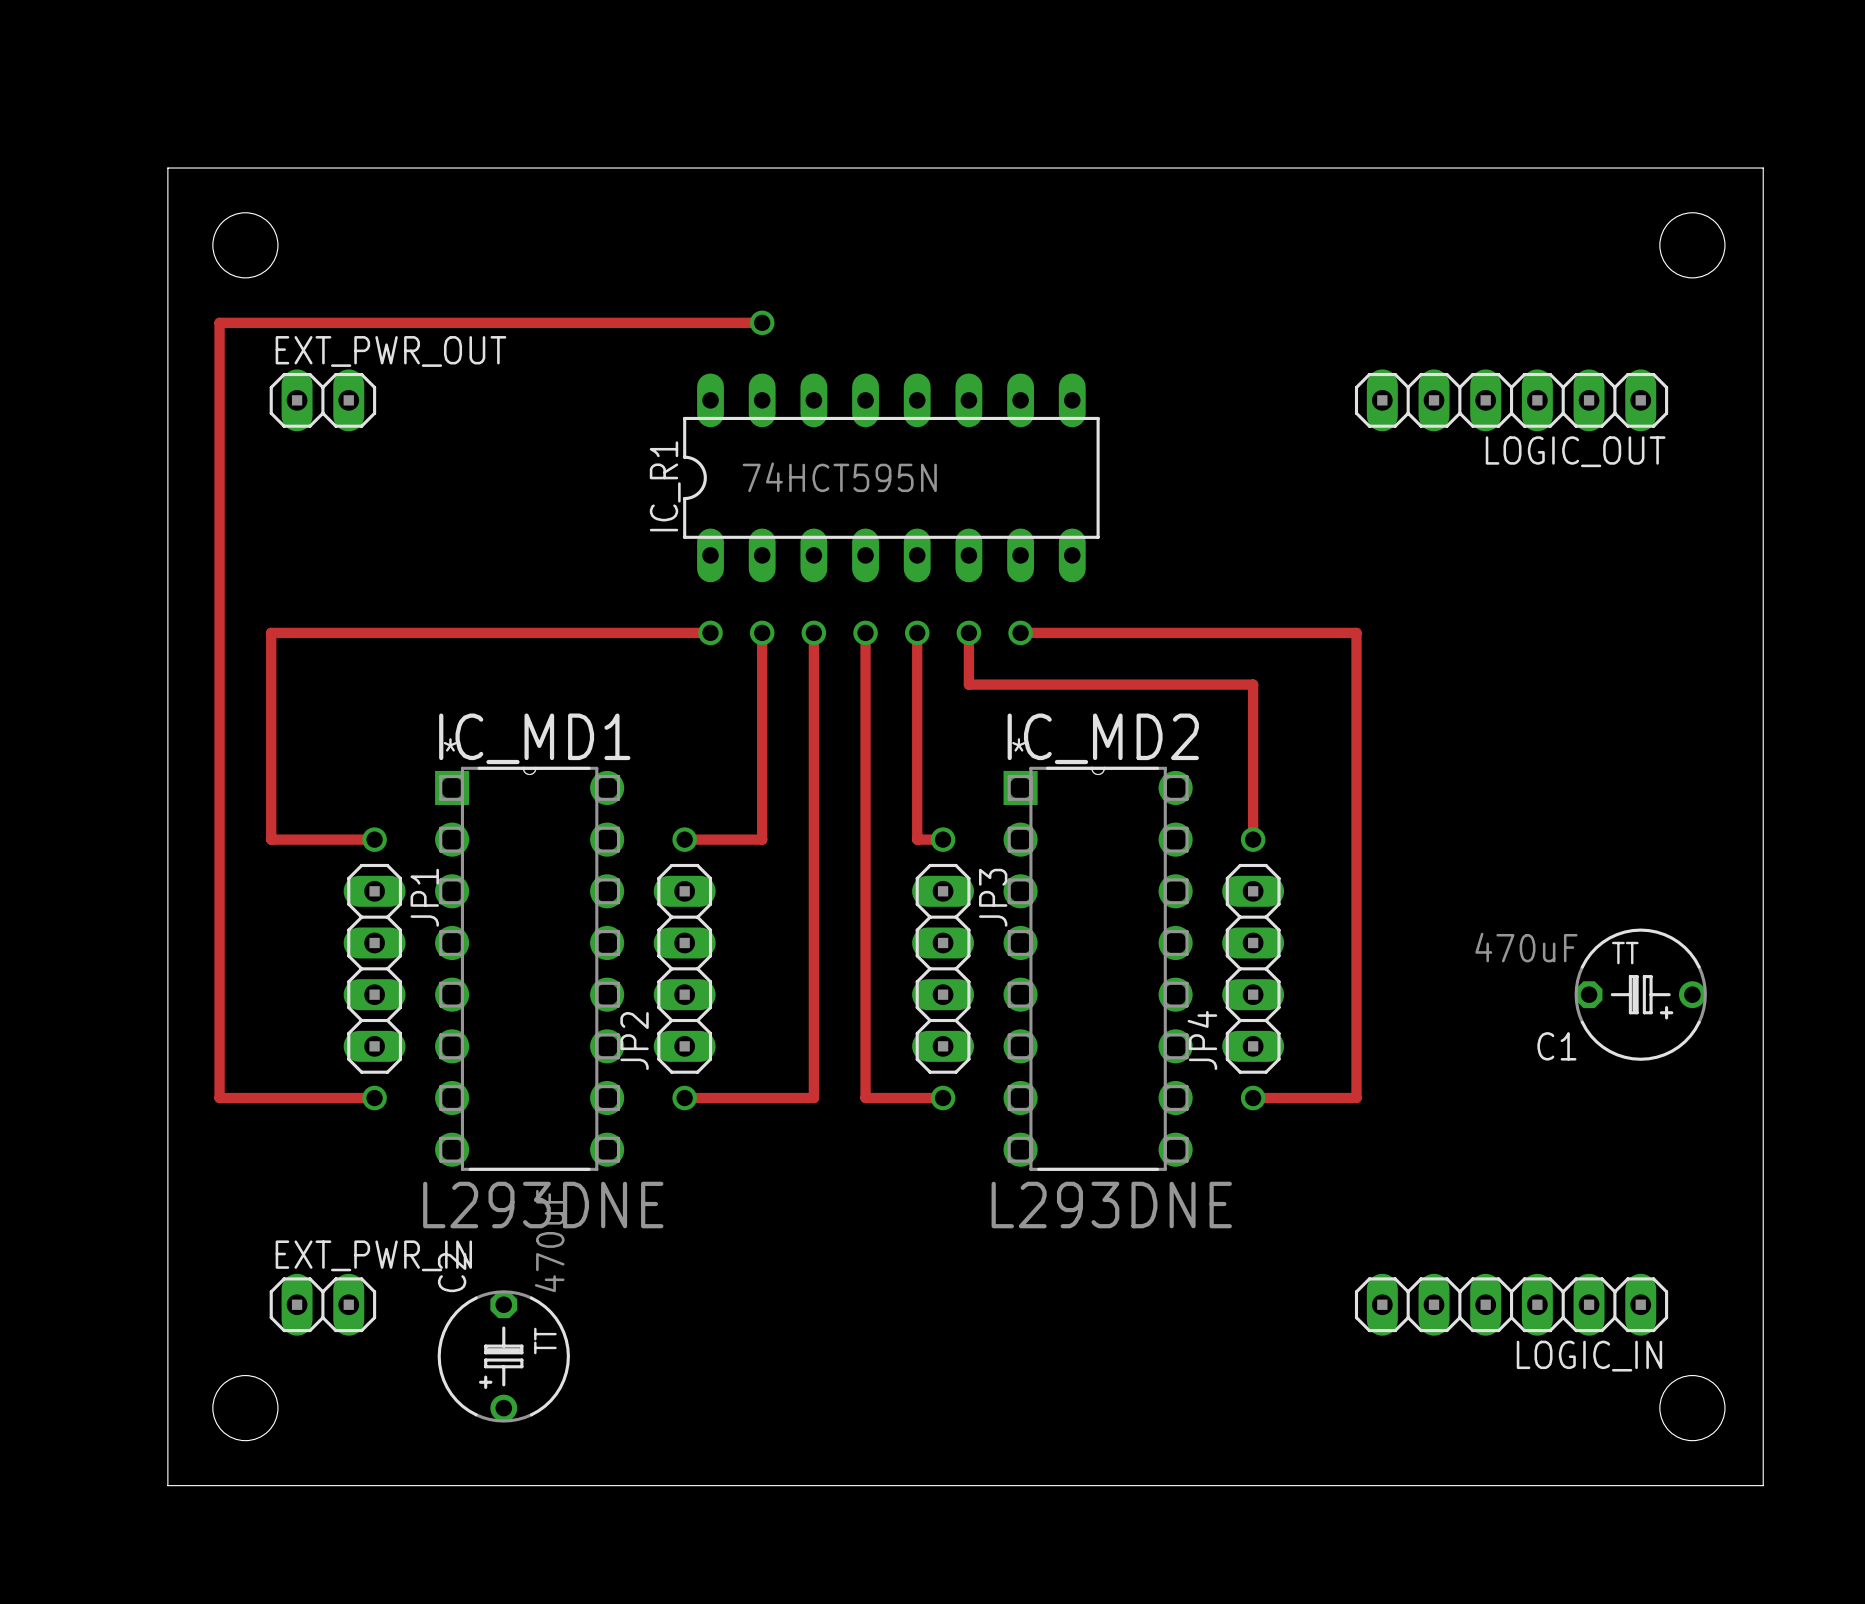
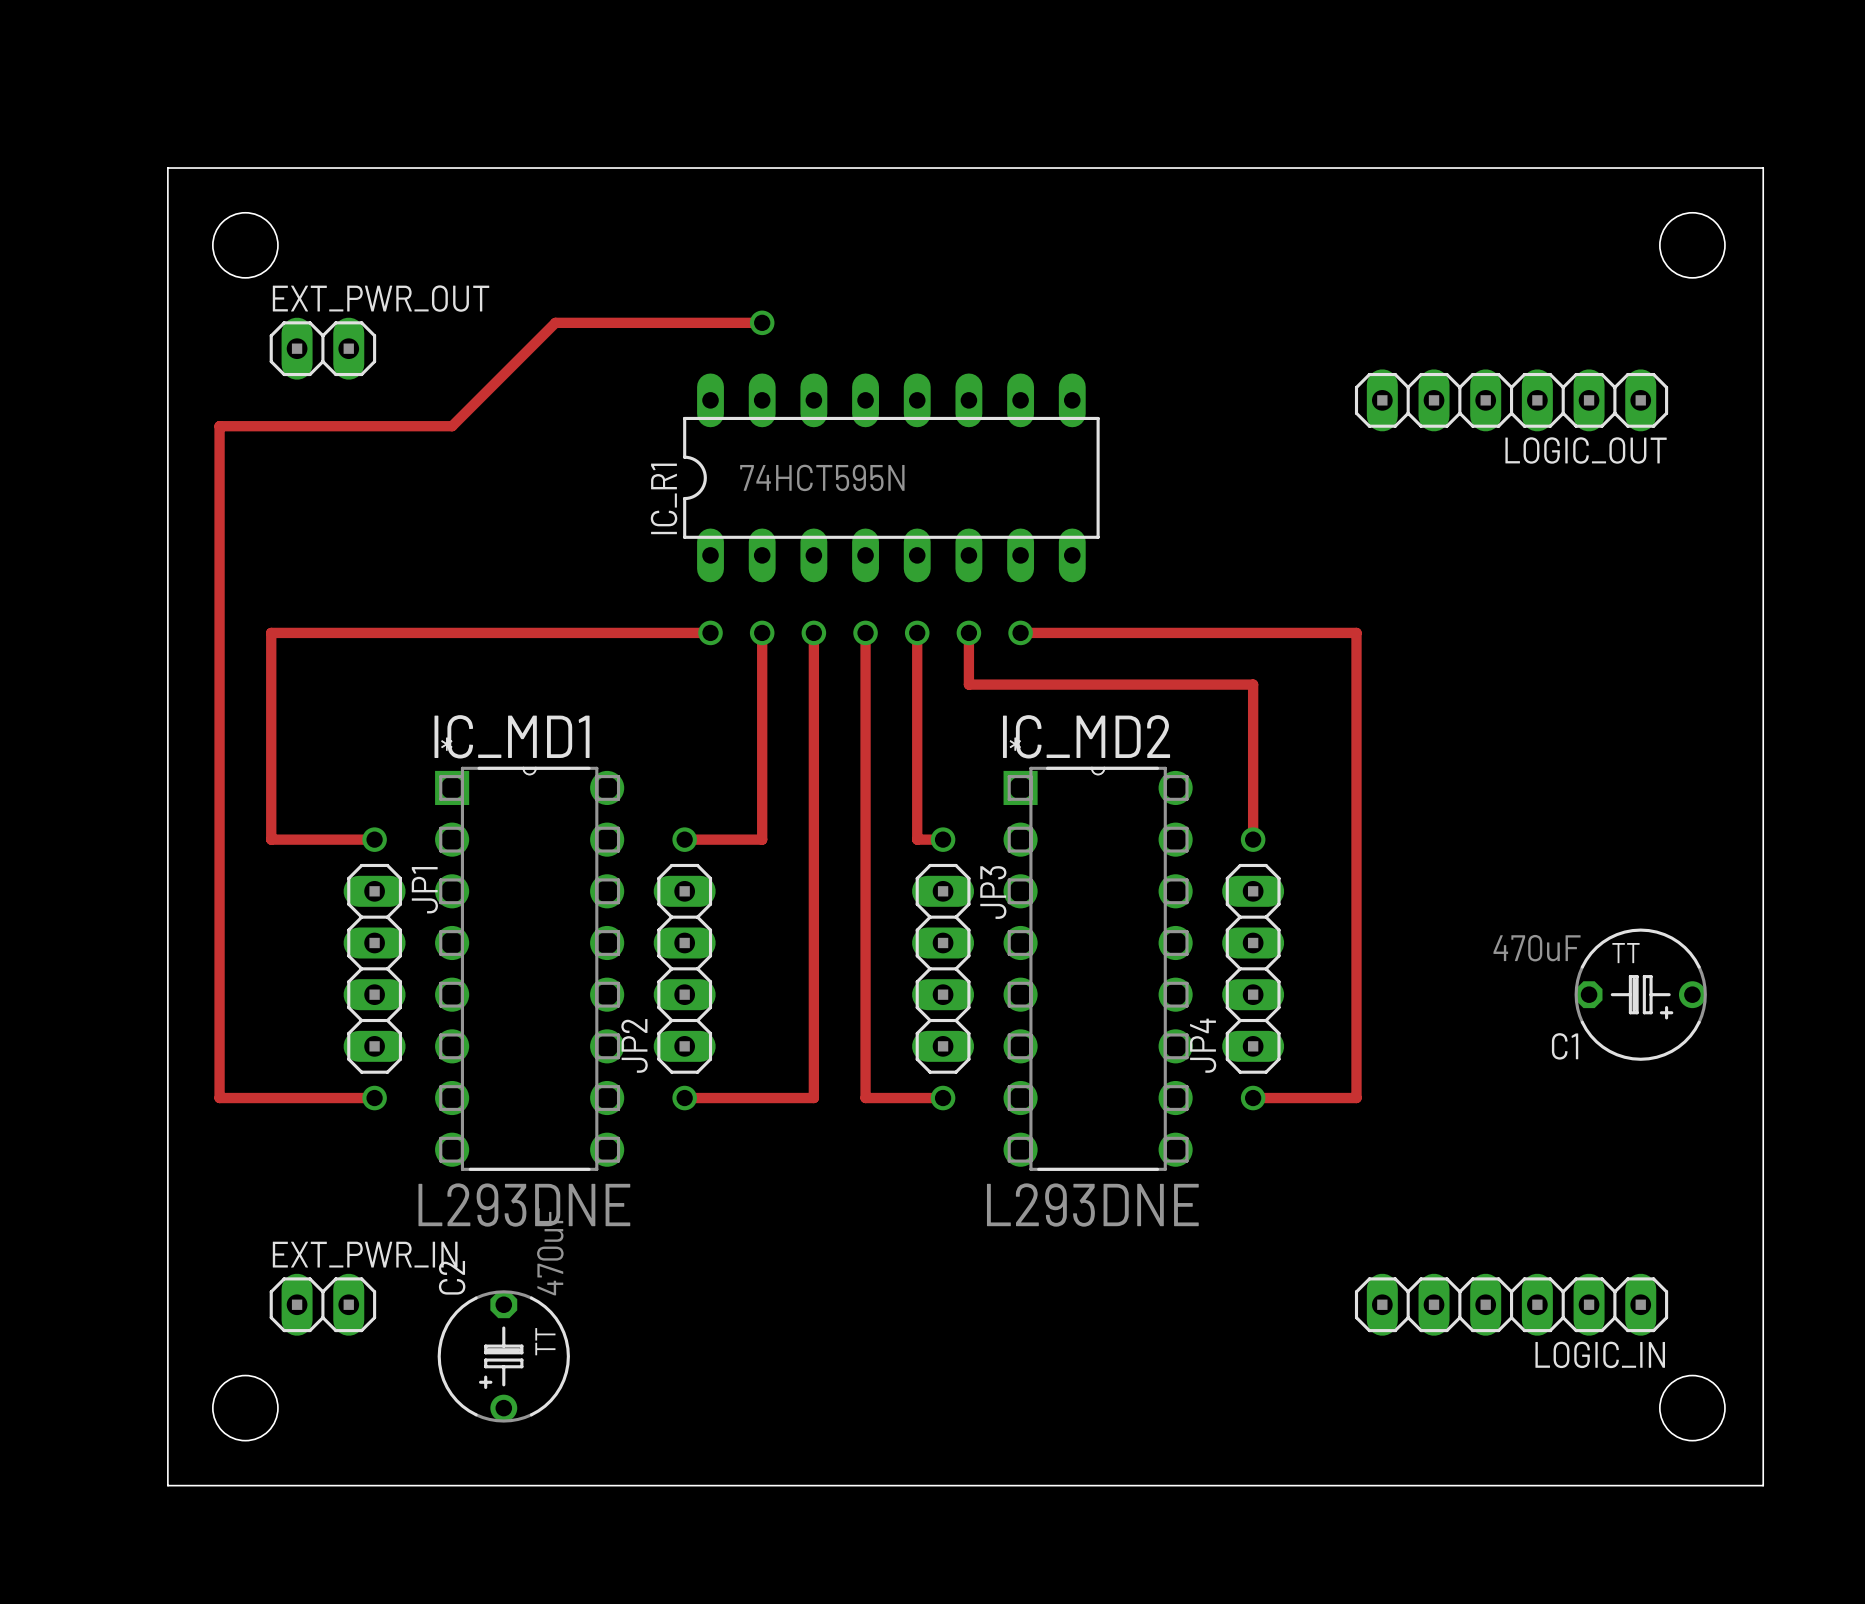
track: (555, 322) (219, 322) (219, 426) -> (555, 322) (452, 426) (219, 426)
EXT_PWR_OUT position: (322, 400) -> (322, 348)

